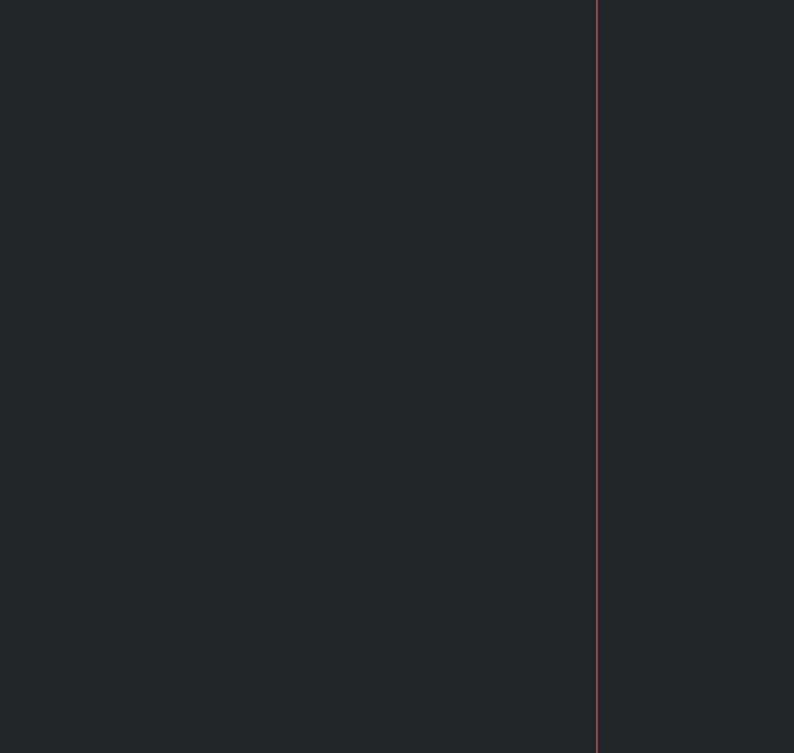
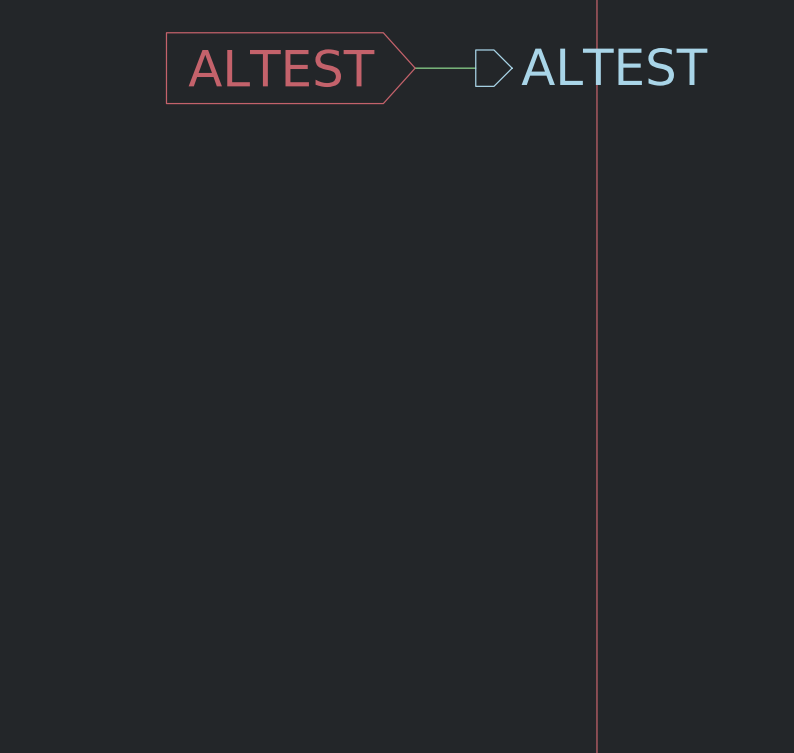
sheet pin: none -> ALTEST (614, 66)
global label: none -> ALTEST (281, 68)
wire: none -> (415, 68) (475, 68)

